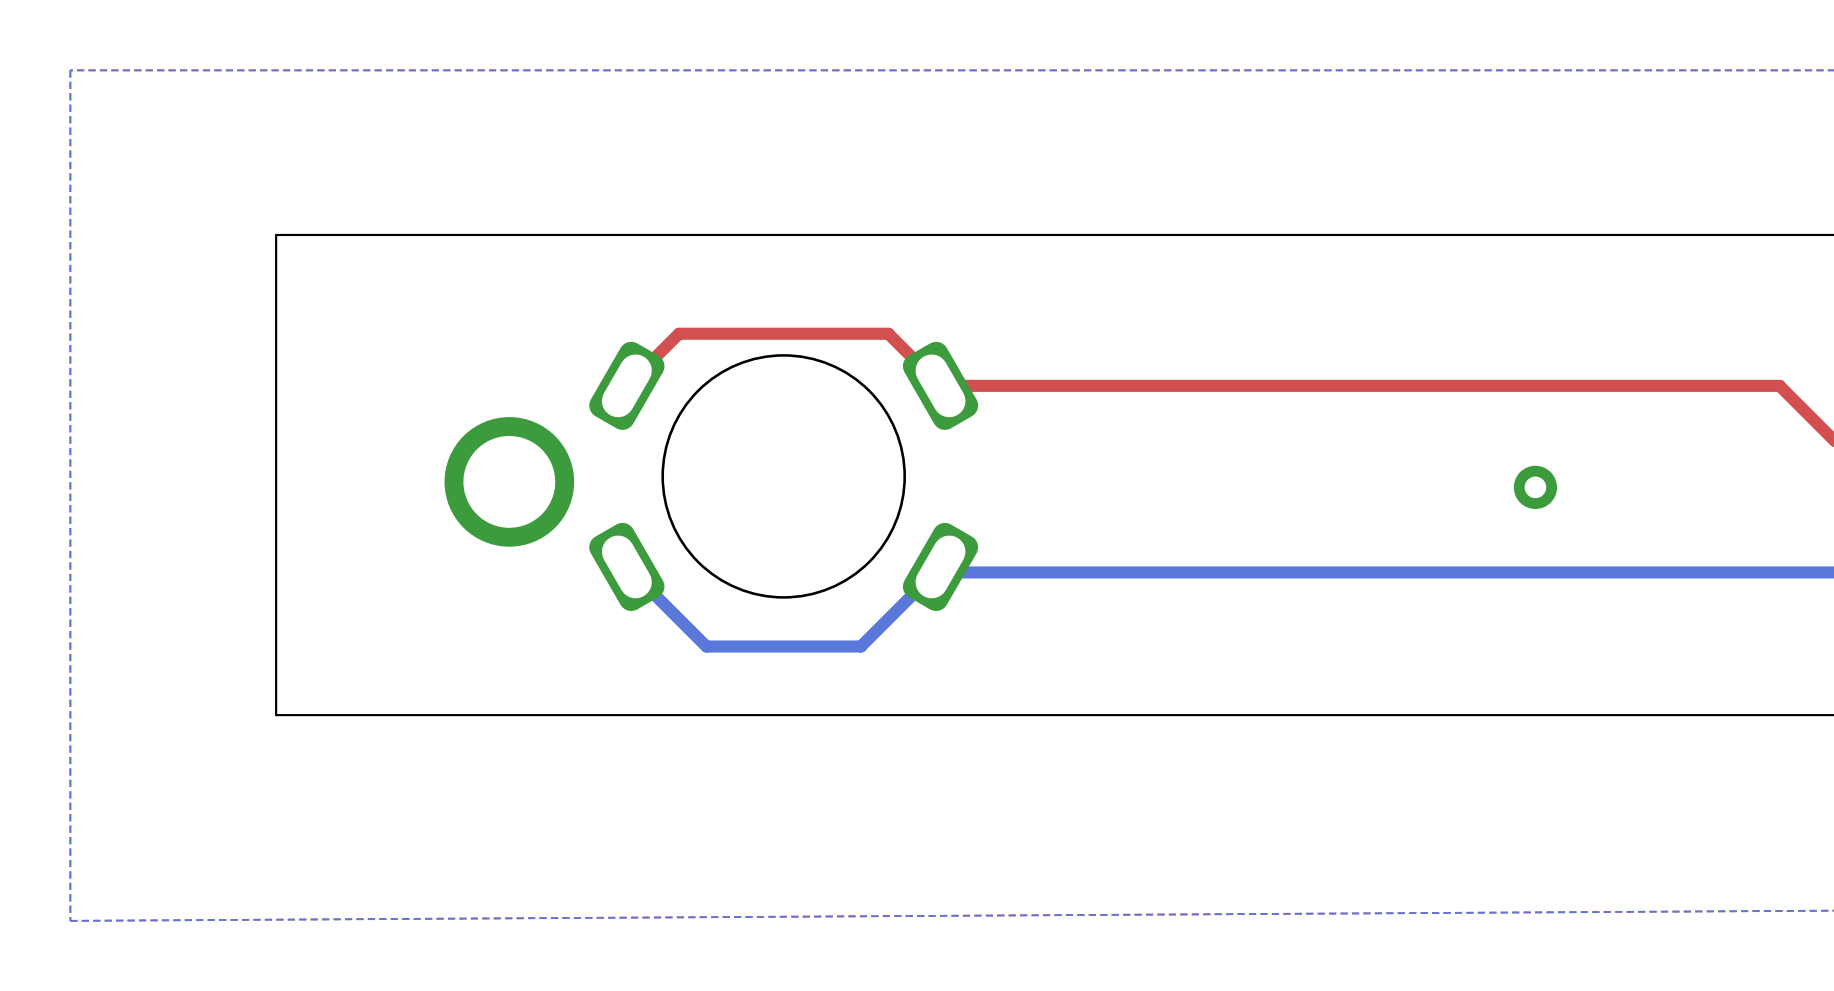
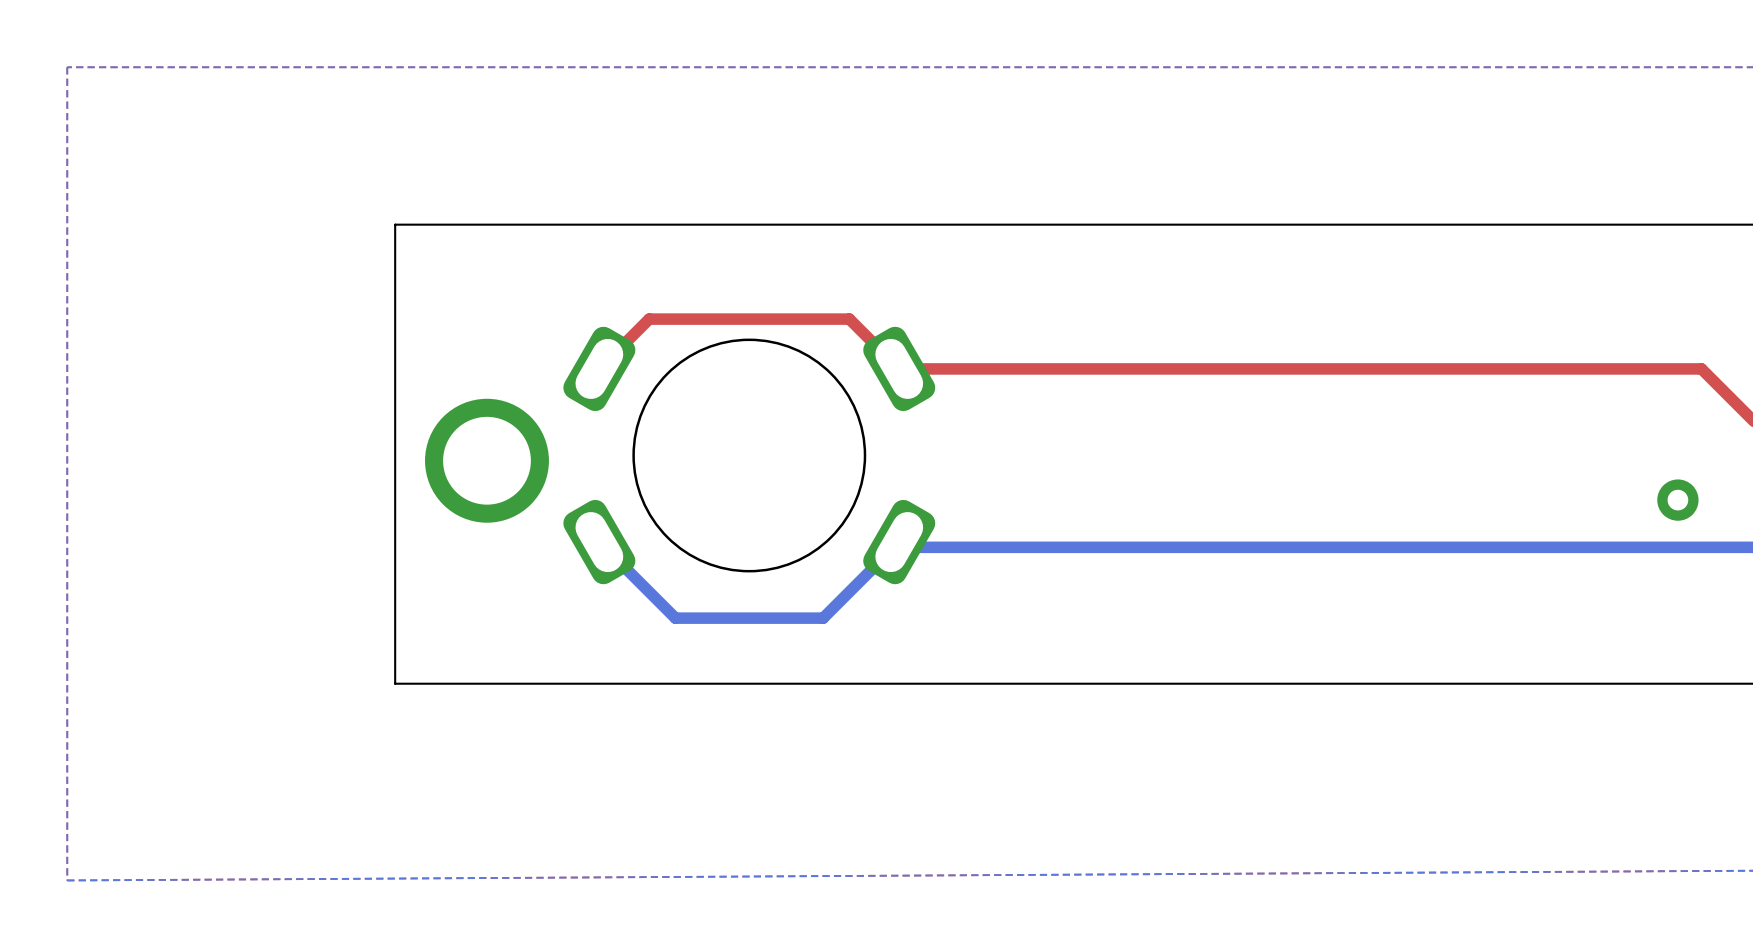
board edge: (413, 234) (276, 234) (276, 715) (413, 715) -> (395, 224) (395, 683)
part position: (1535, 487) -> (1677, 500)

